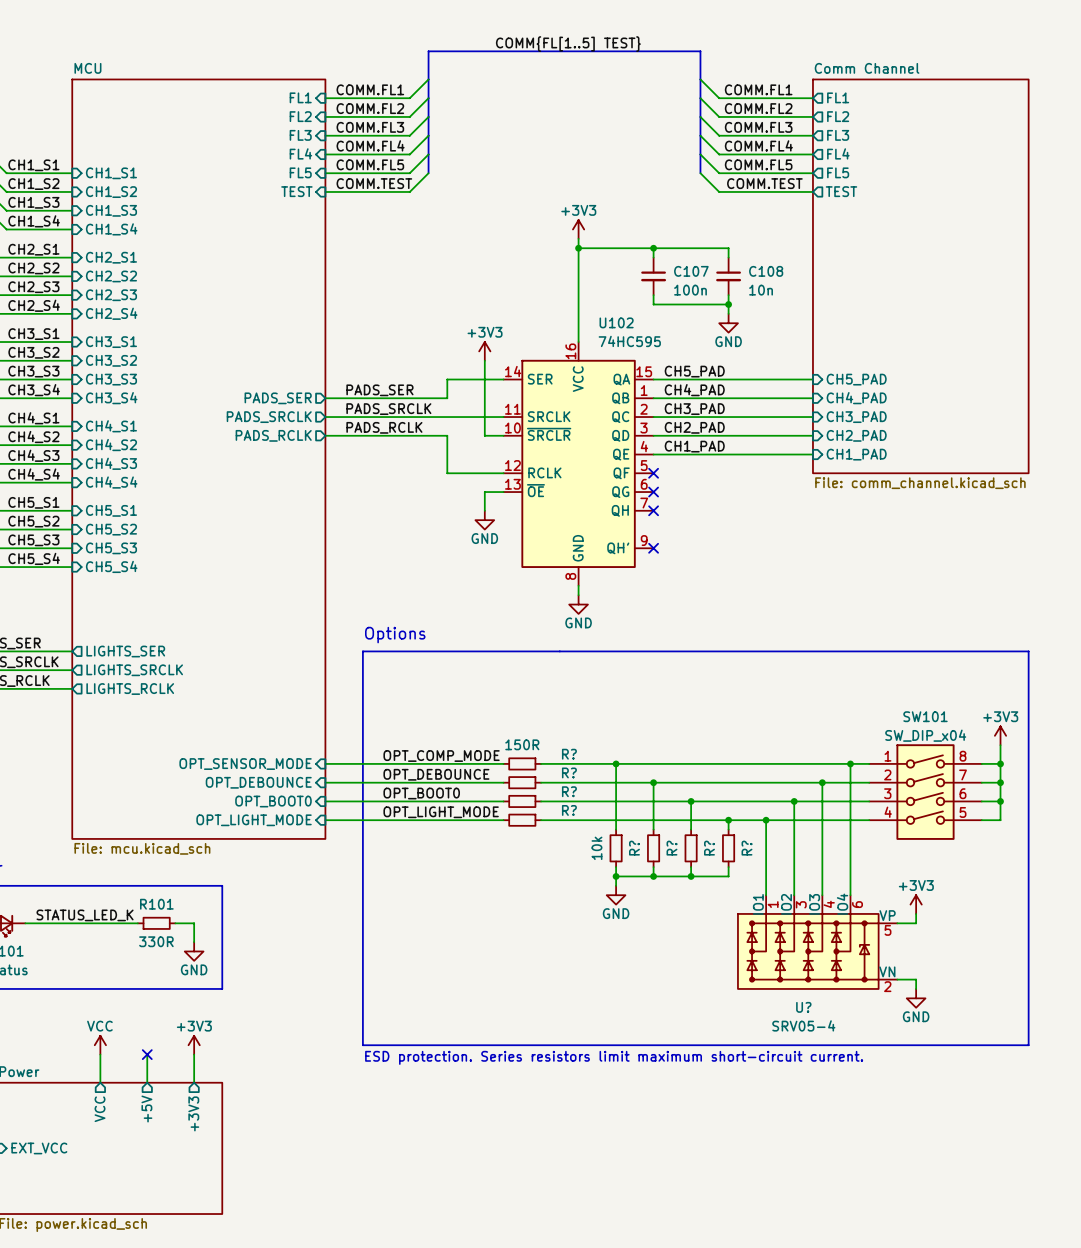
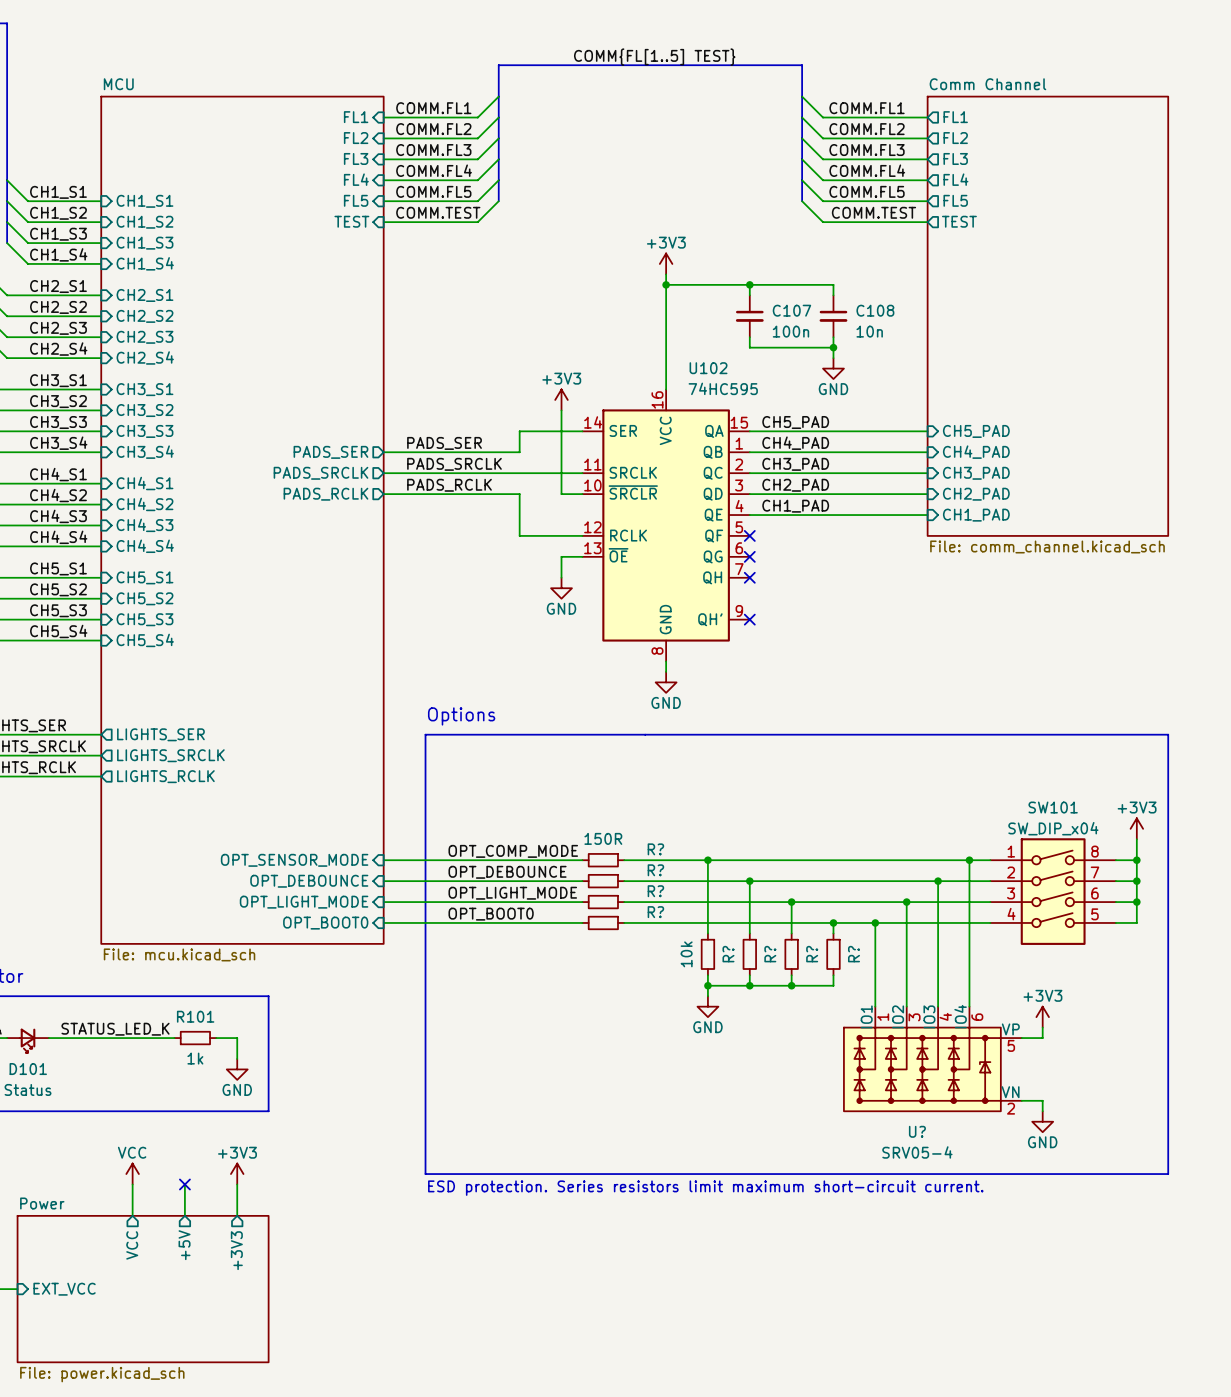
label: OPT_BOOT0 (421, 793) -> OPT_LIGHT_MODE (512, 893)
sheet pin: OPT_BOOT0 (273, 801) -> OPT_LIGHT_MODE (304, 902)
label: OPT_LIGHT_MODE (441, 812) -> OPT_BOOT0 (491, 914)
sheet pin: OPT_LIGHT_MODE (254, 820) -> OPT_BOOT0 (325, 923)
R101 value: 330R (156, 941) -> 1k (195, 1058)

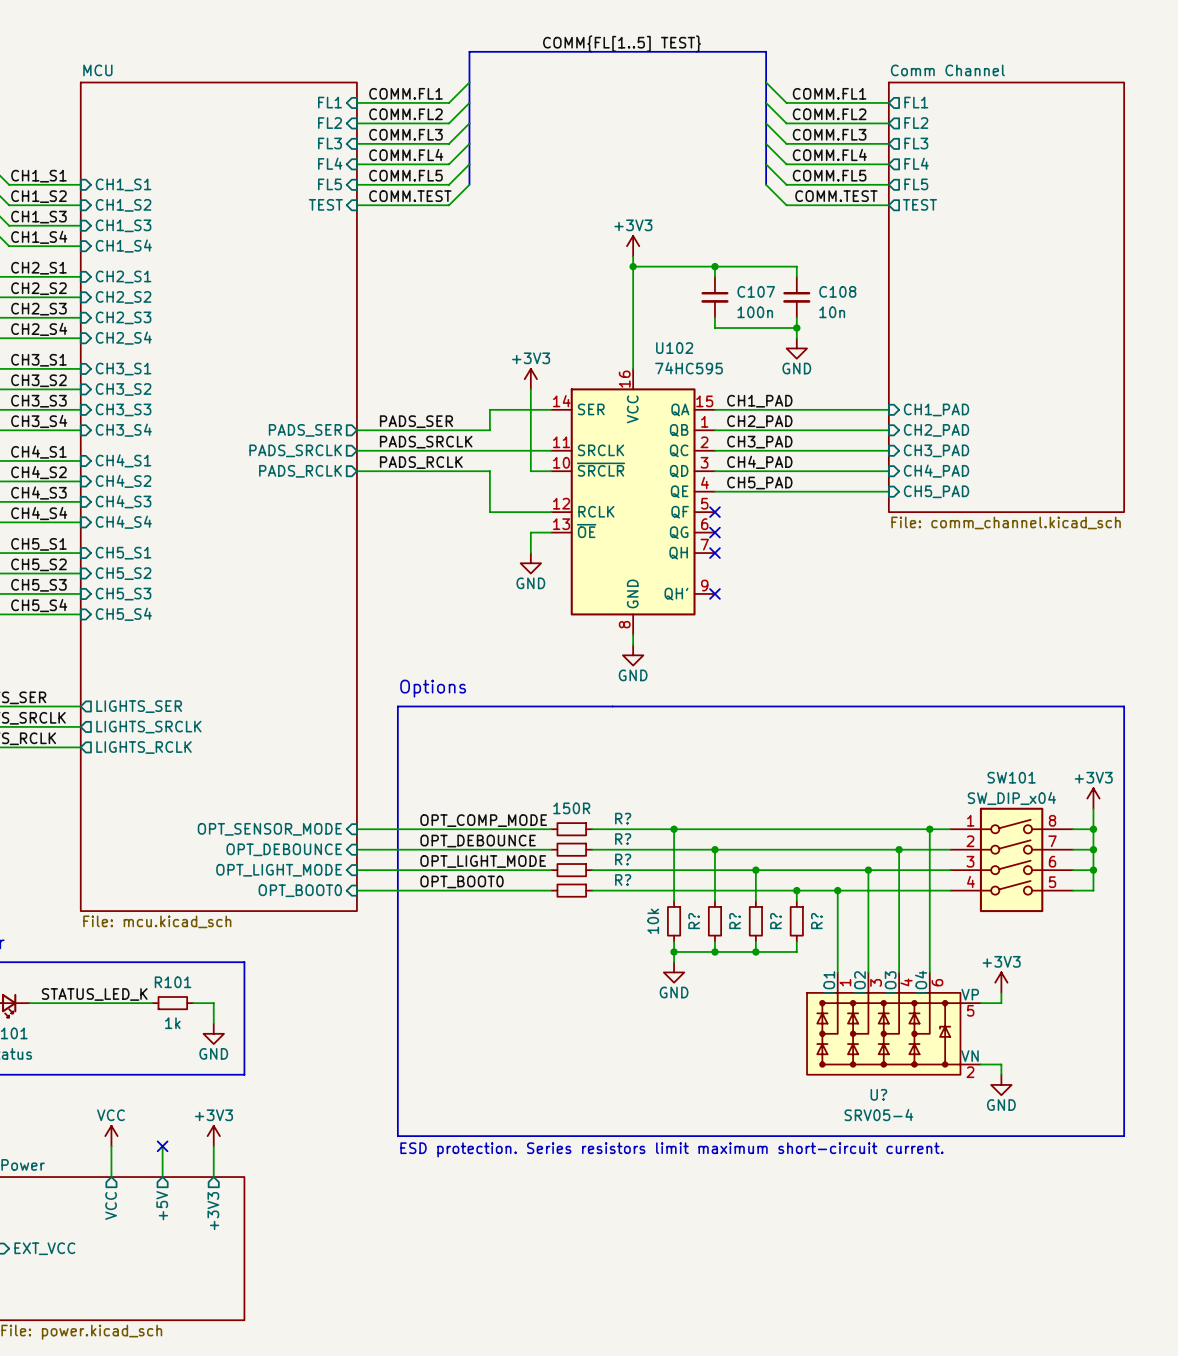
label: CH5_PAD (795, 422) -> CH1_PAD (759, 401)
sheet pin: CH5_PAD (976, 431) -> CH1_PAD (936, 409)
label: CH4_PAD (795, 443) -> CH2_PAD (759, 421)
sheet pin: CH4_PAD (976, 452) -> CH2_PAD (936, 430)
label: CH2_PAD (795, 485) -> CH4_PAD (759, 462)
sheet pin: CH2_PAD (976, 494) -> CH4_PAD (936, 471)
label: CH1_PAD (795, 506) -> CH5_PAD (759, 483)
sheet pin: CH1_PAD (976, 515) -> CH5_PAD (936, 491)

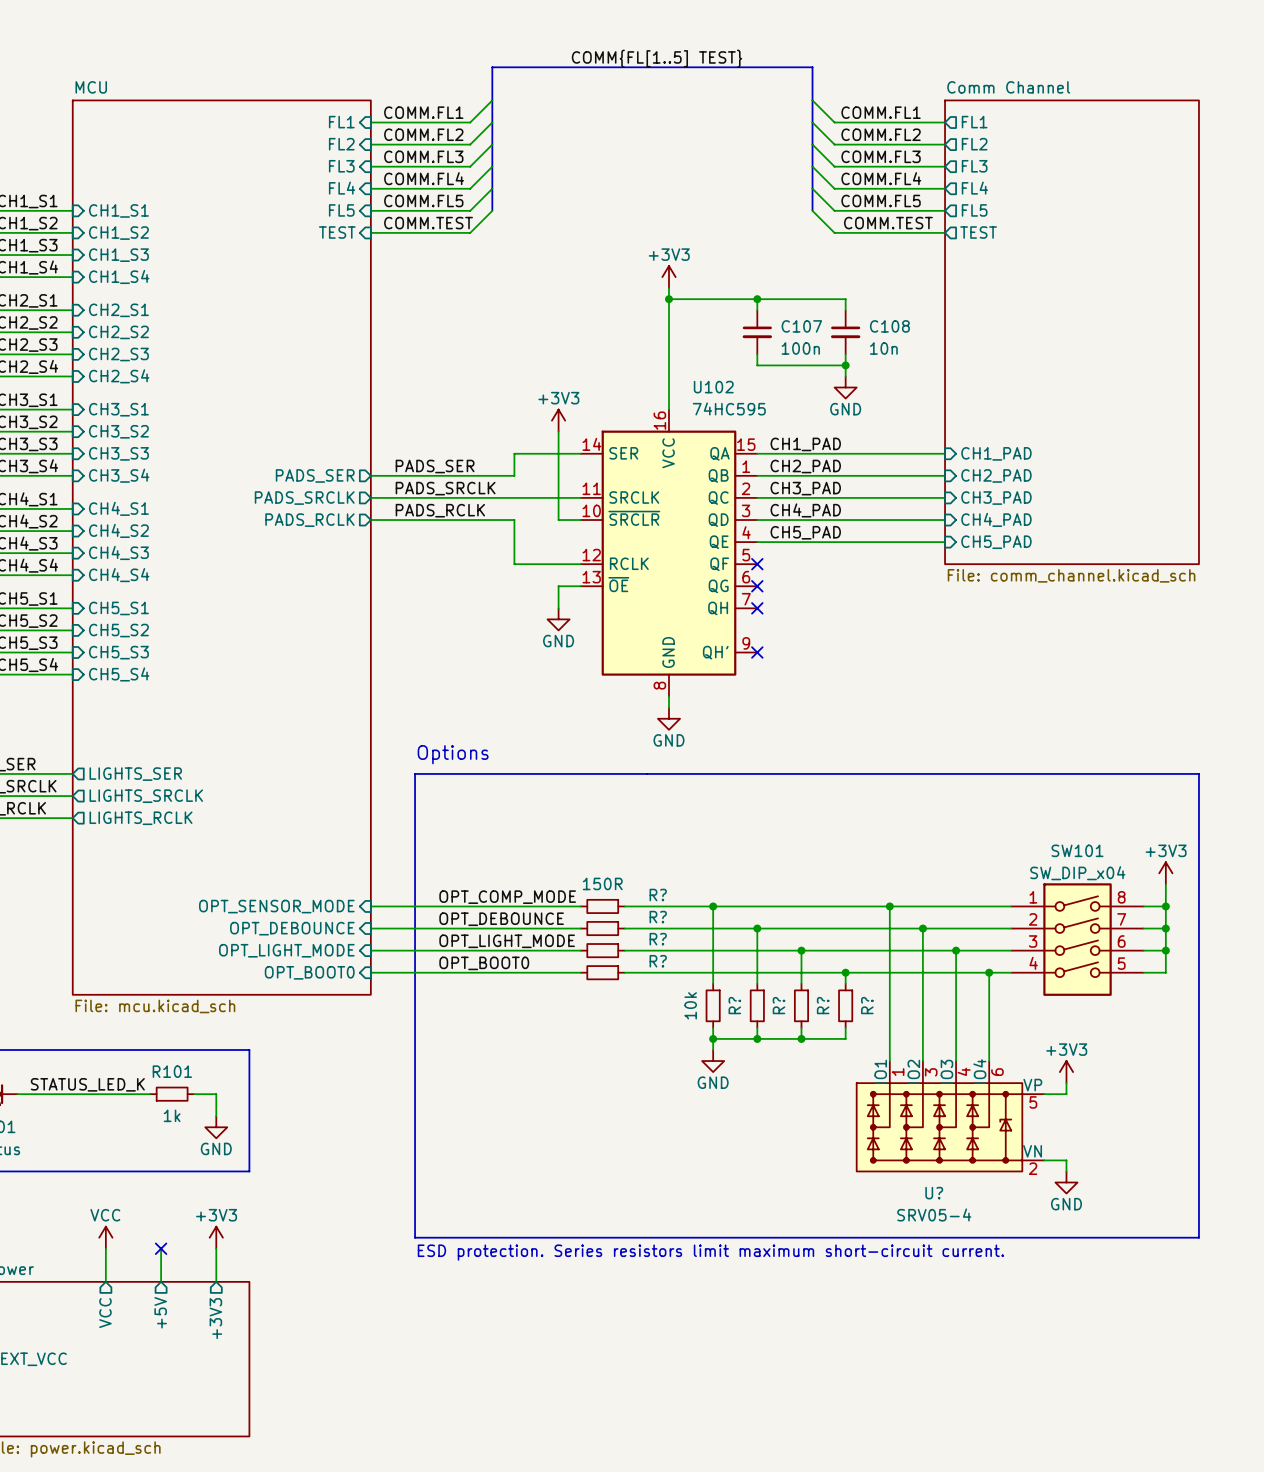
junction: none -> (889, 906)
wire: (929, 829) (929, 890) -> (889, 906) (889, 972)
junction: (929, 829) -> none
junction: none -> (922, 928)
wire: (899, 849) (899, 870) -> (922, 928) (922, 950)
junction: (899, 849) -> none
junction: (868, 870) -> none
junction: none -> (956, 950)
junction: (837, 890) -> none
junction: none -> (989, 972)

